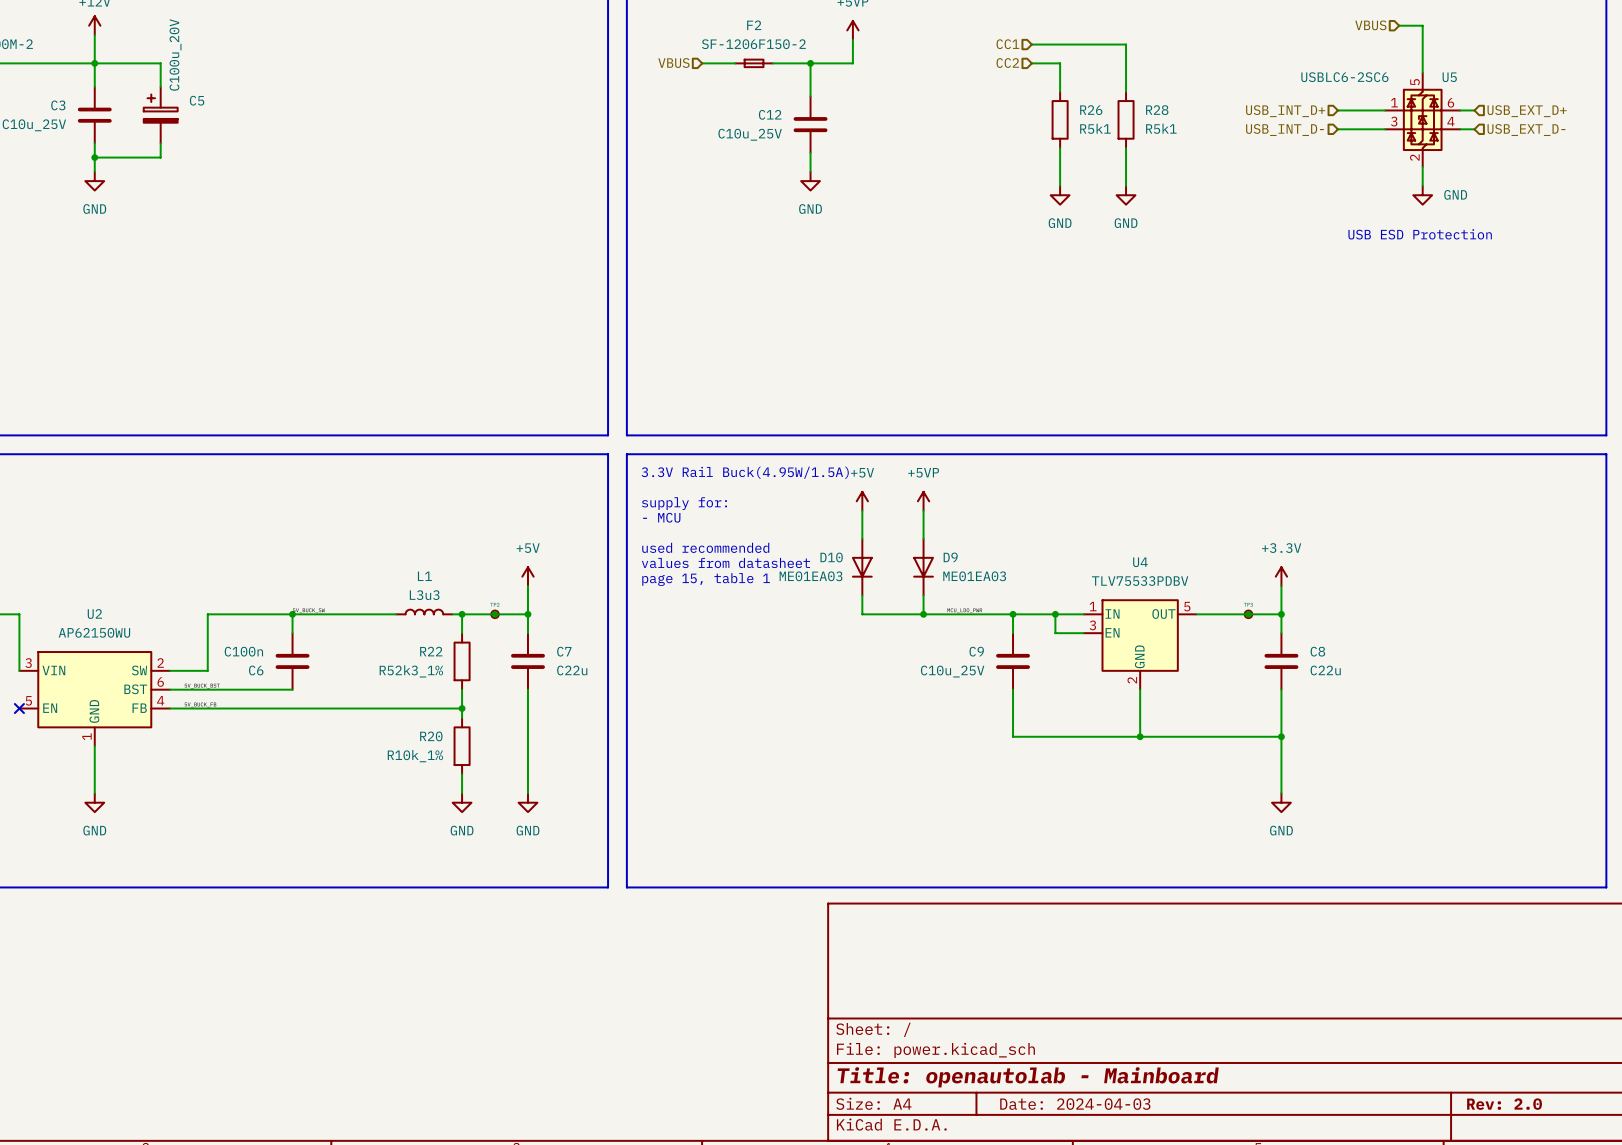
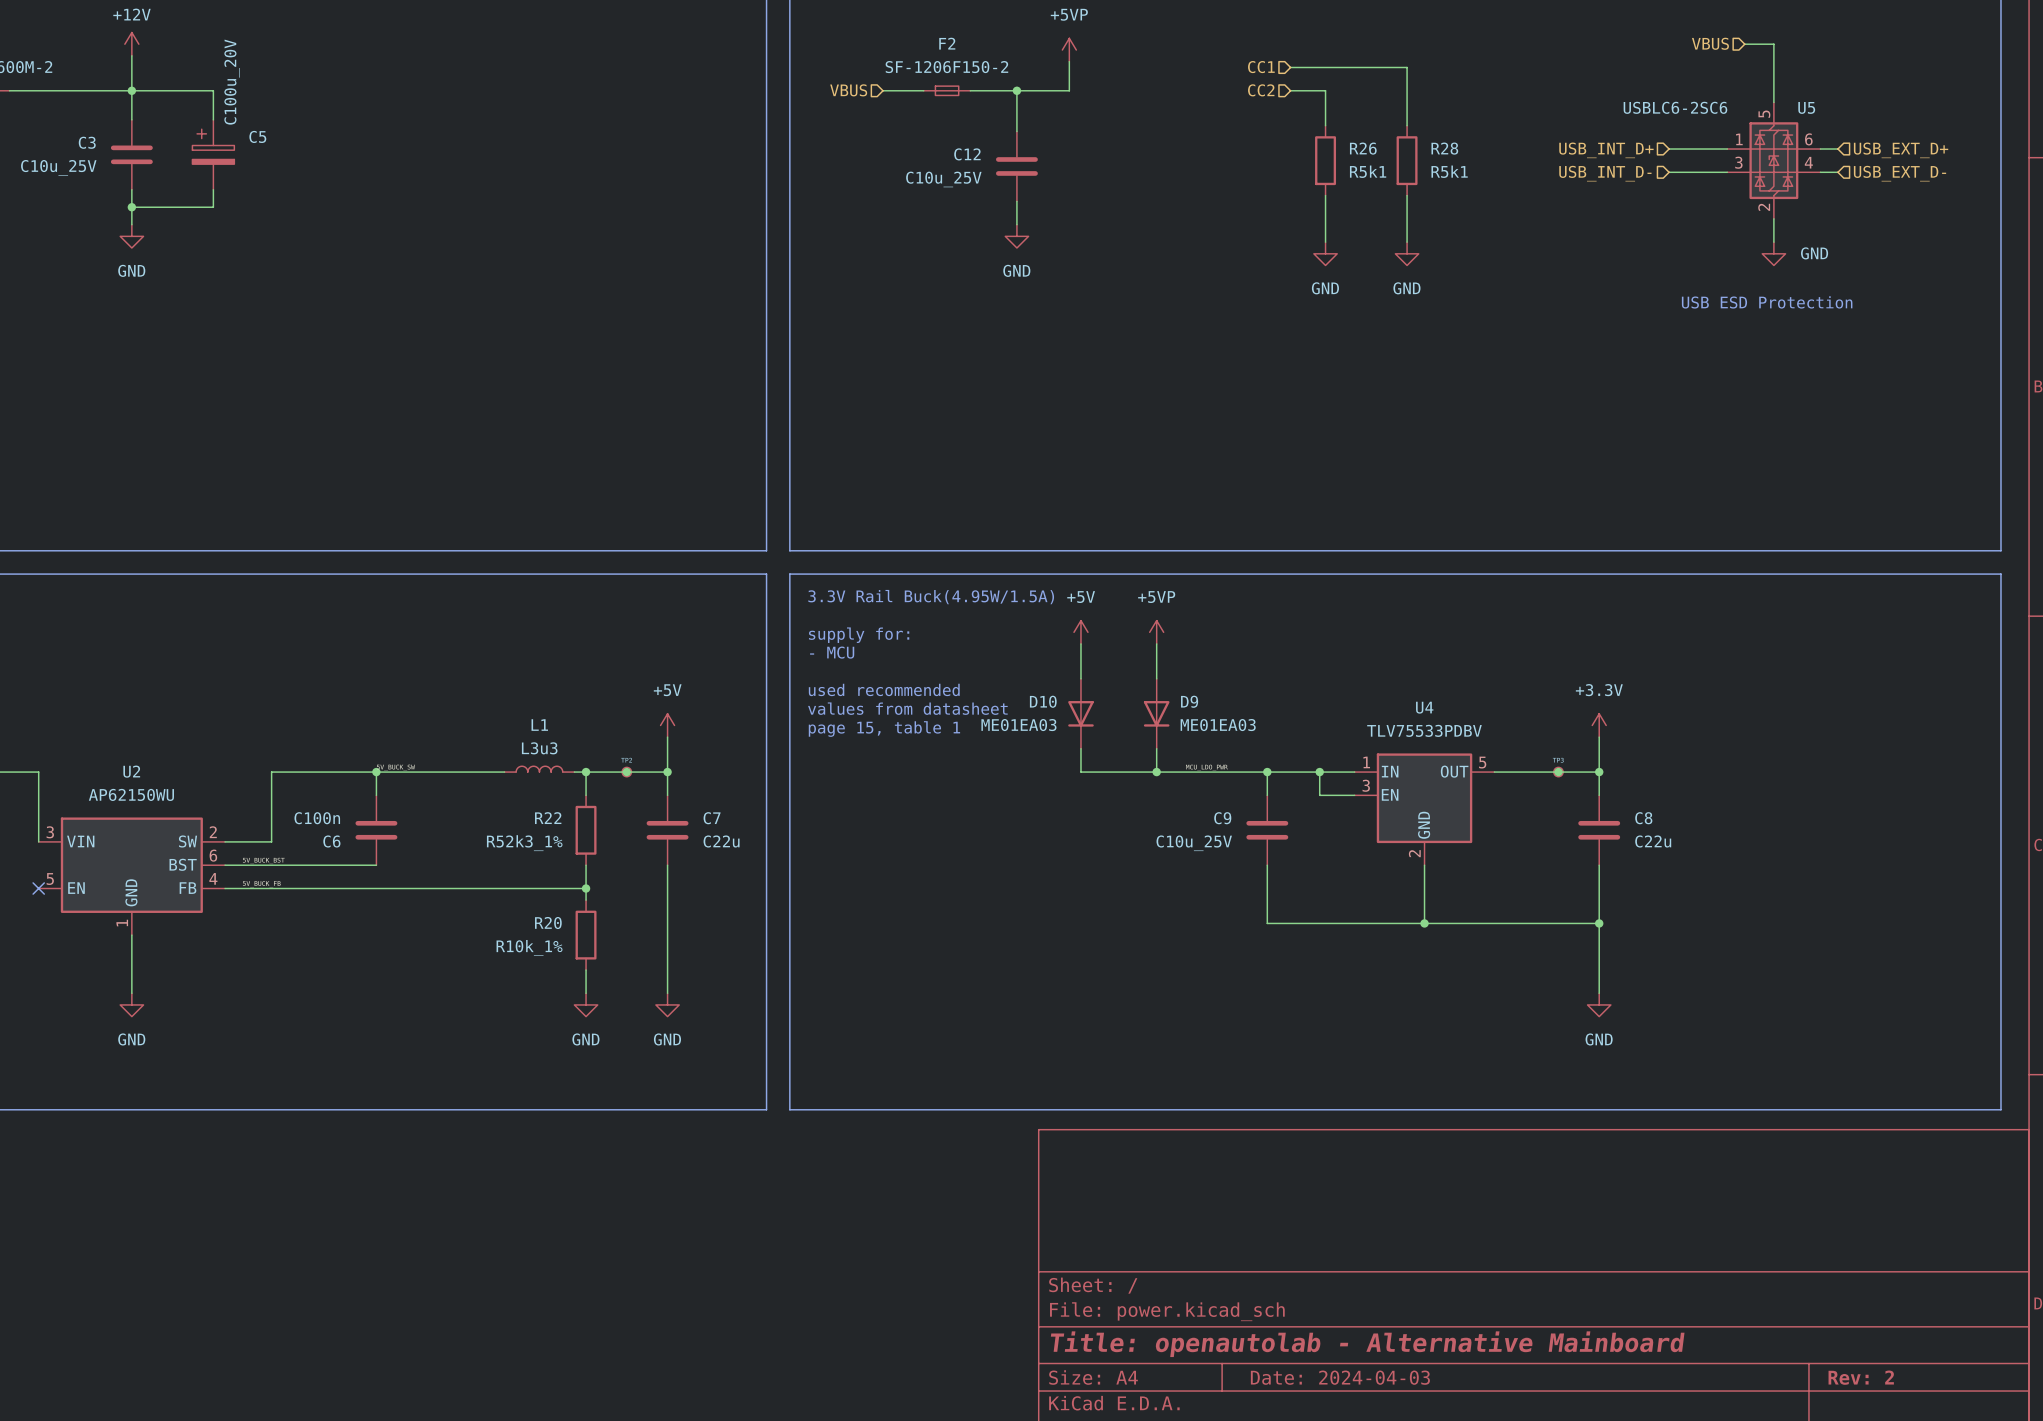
title block: Title: openautolab - Mainboard (1028, 1077) -> Title: openautolab - Alternative Mainboard (1367, 1344)
title block: Rev: 2.0 (1504, 1104) -> Rev: 2 (1861, 1377)

